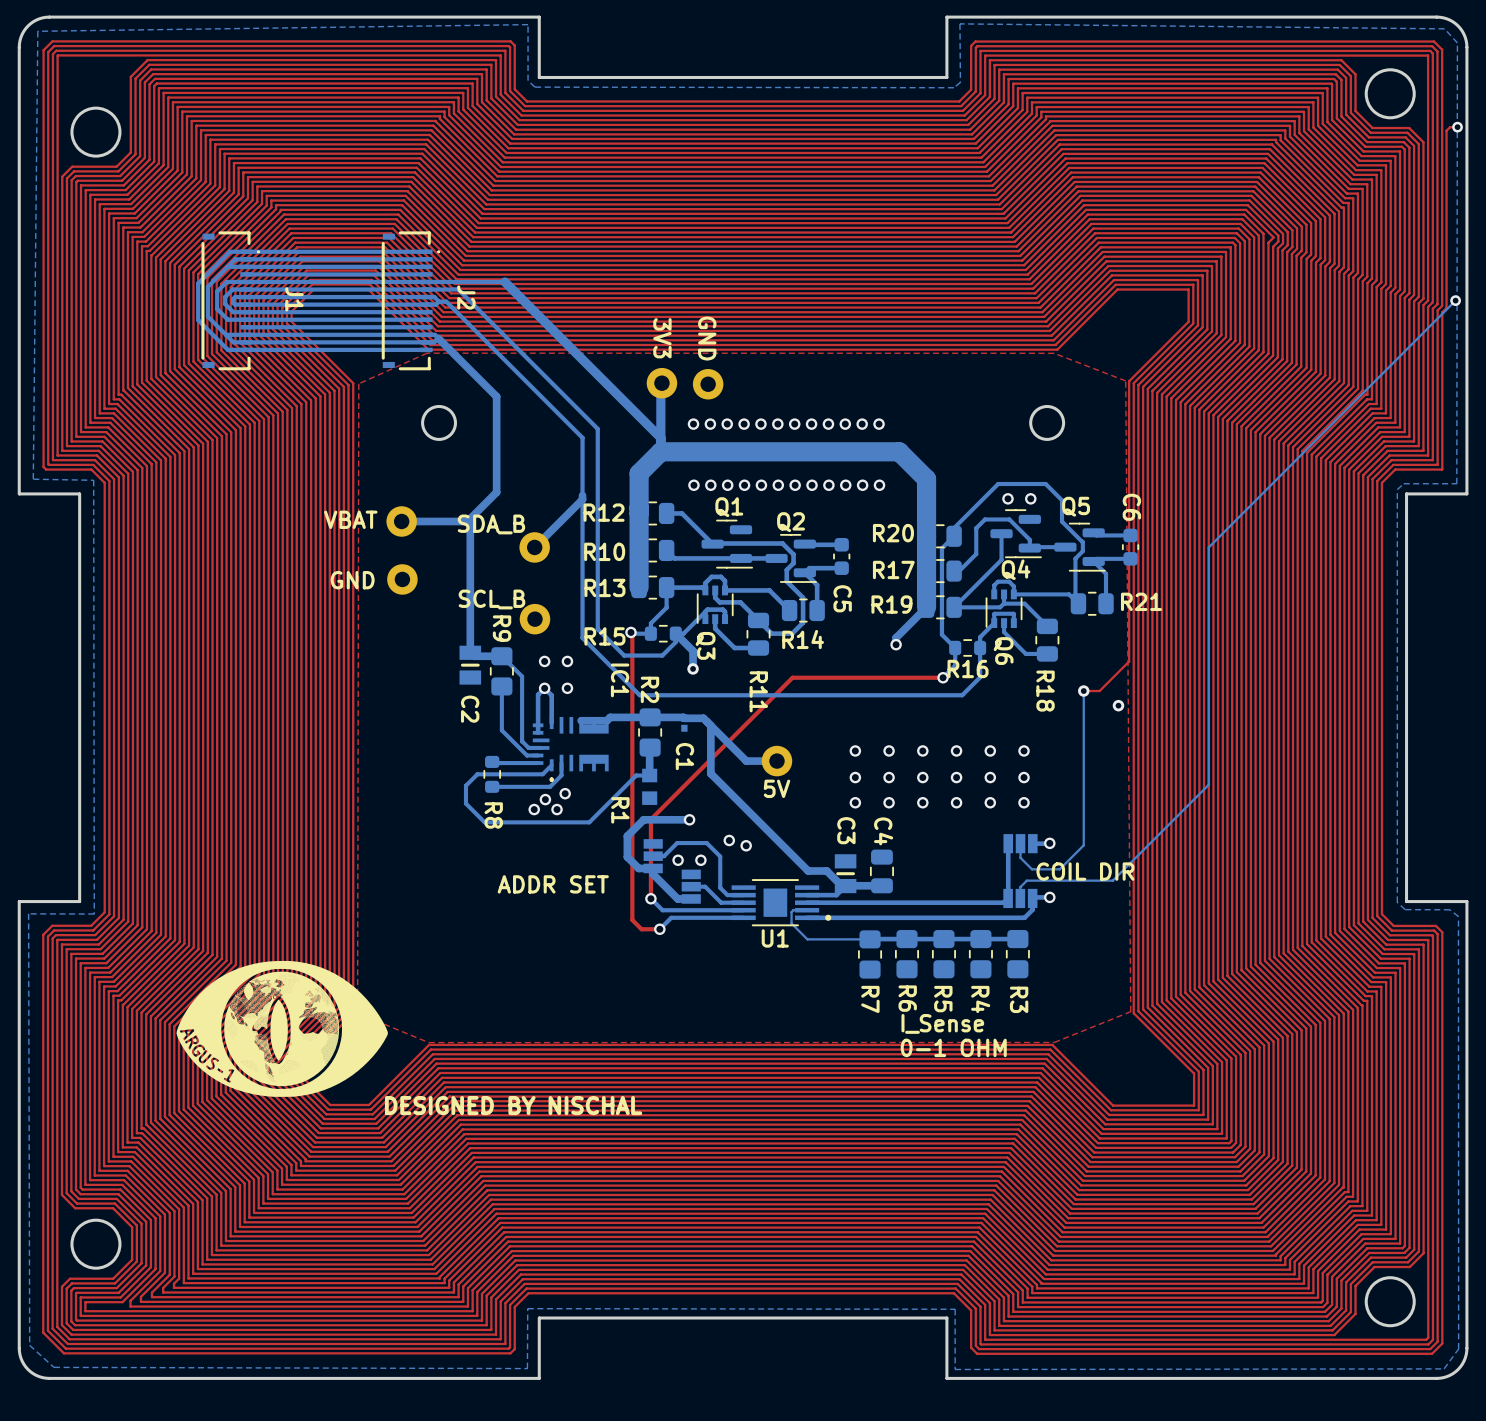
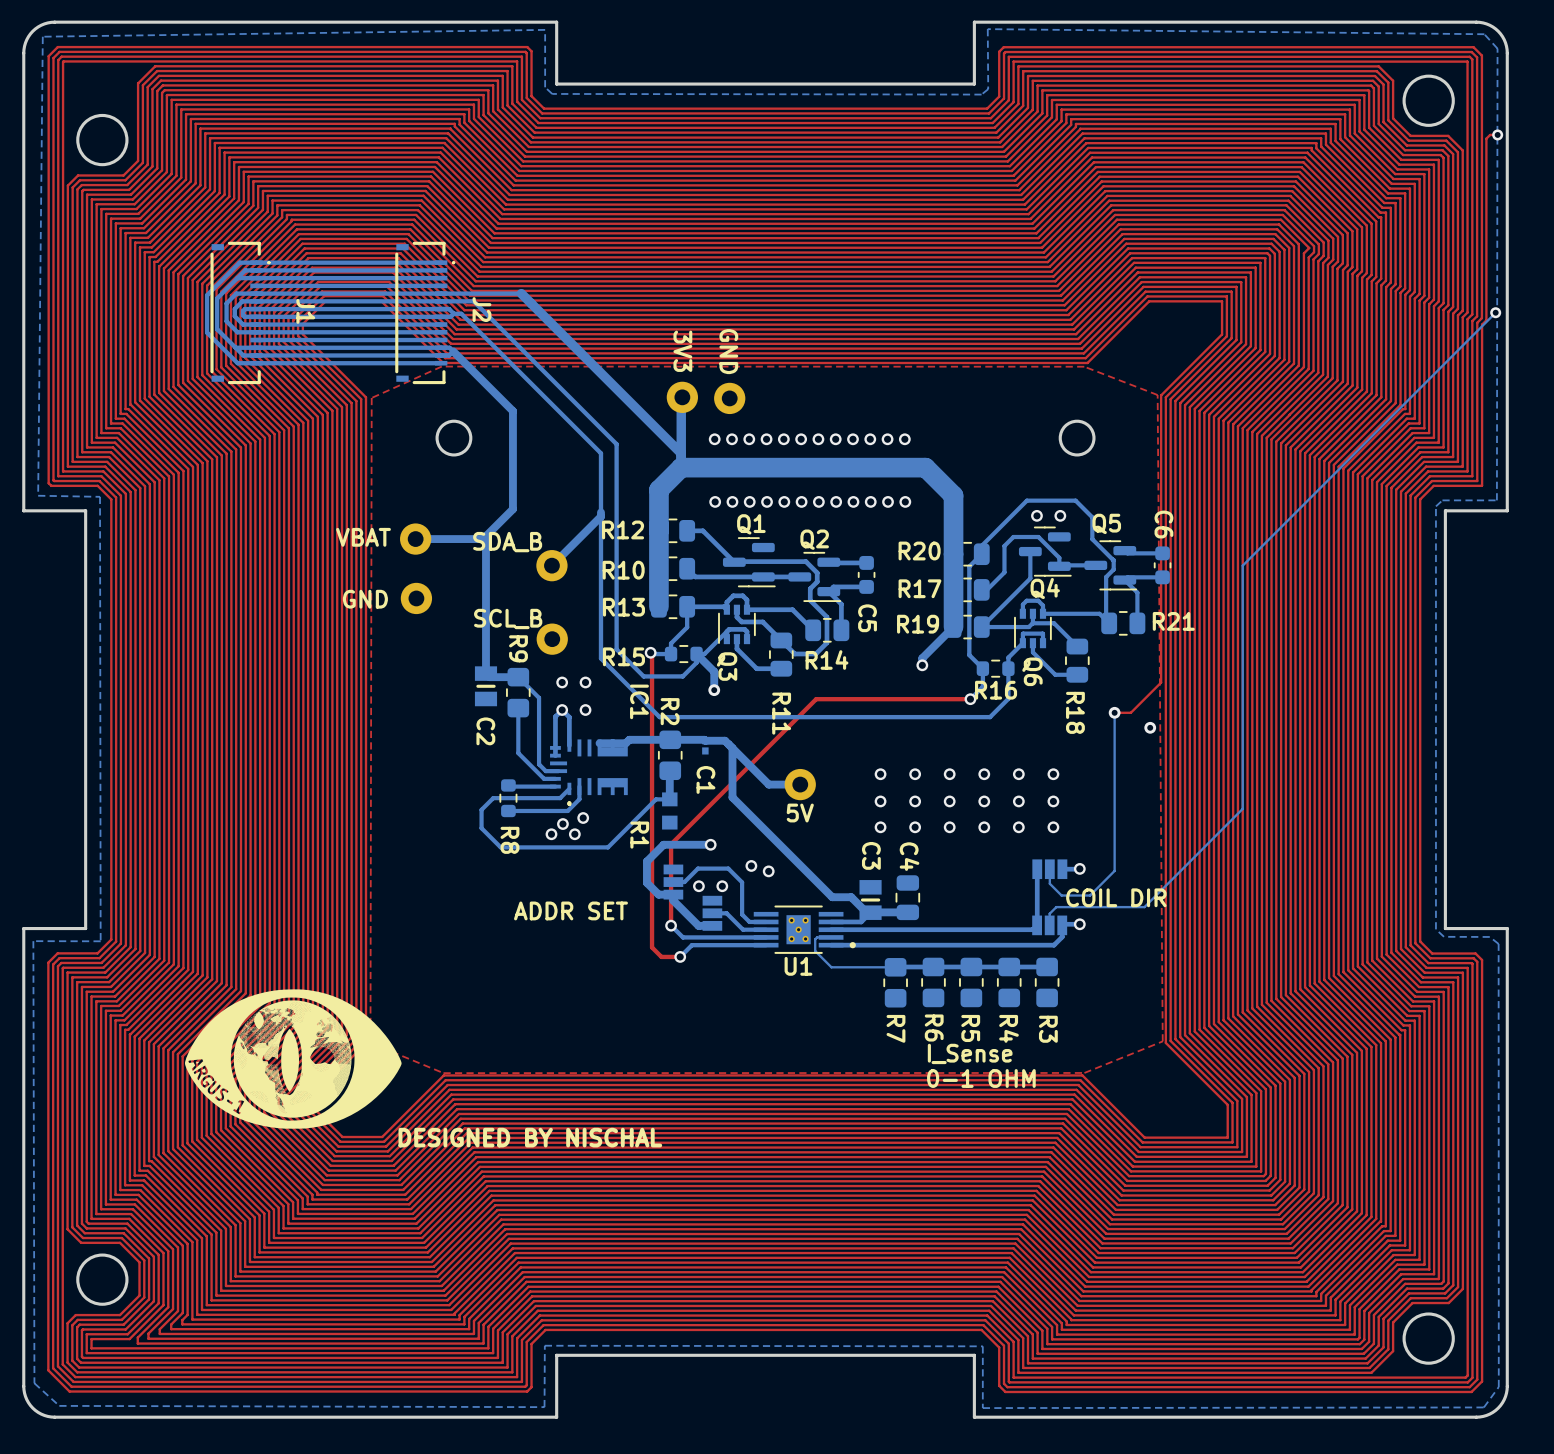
U1 footprint: [731, 879, 832, 927] -> [753, 905, 856, 954]

